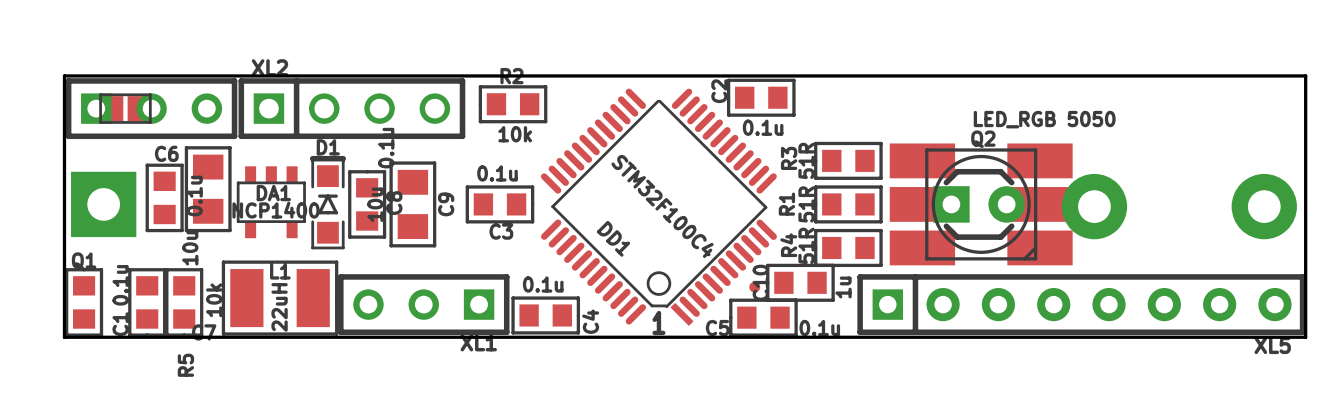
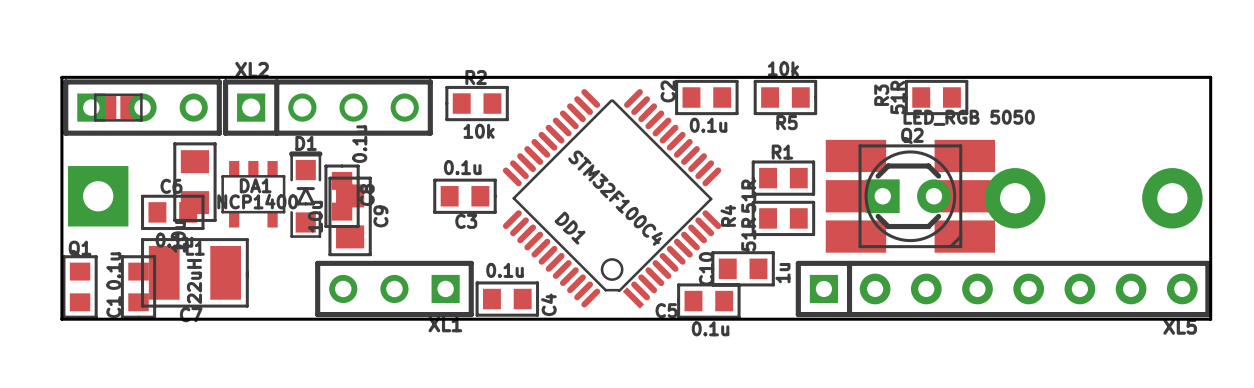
R3 position: (848, 160) -> (936, 97)
C6 rotation: 0° (164, 197) -> 90° clockwise (172, 212)
C9 position: (412, 204) -> (350, 216)
R1 name rotation: 0° (786, 204) -> 90° clockwise (782, 152)
R1 name position: R1 (786, 204) -> R1 (782, 152)
R1 position: (848, 204) -> (783, 178)
R4 position: (848, 247) -> (783, 218)
part: (754, 287) -> none
L1 position: (280, 298) -> (194, 272)
R5 rotation: 0° (184, 302) -> 90° counterclockwise (785, 97)
R5 position: (184, 302) -> (785, 97)
line: (654, 319) (658, 313) (658, 332) -> none
C5 value position: 0.1u (819, 328) -> 0.1u (710, 328)
line: (654, 332) (663, 332) -> none

